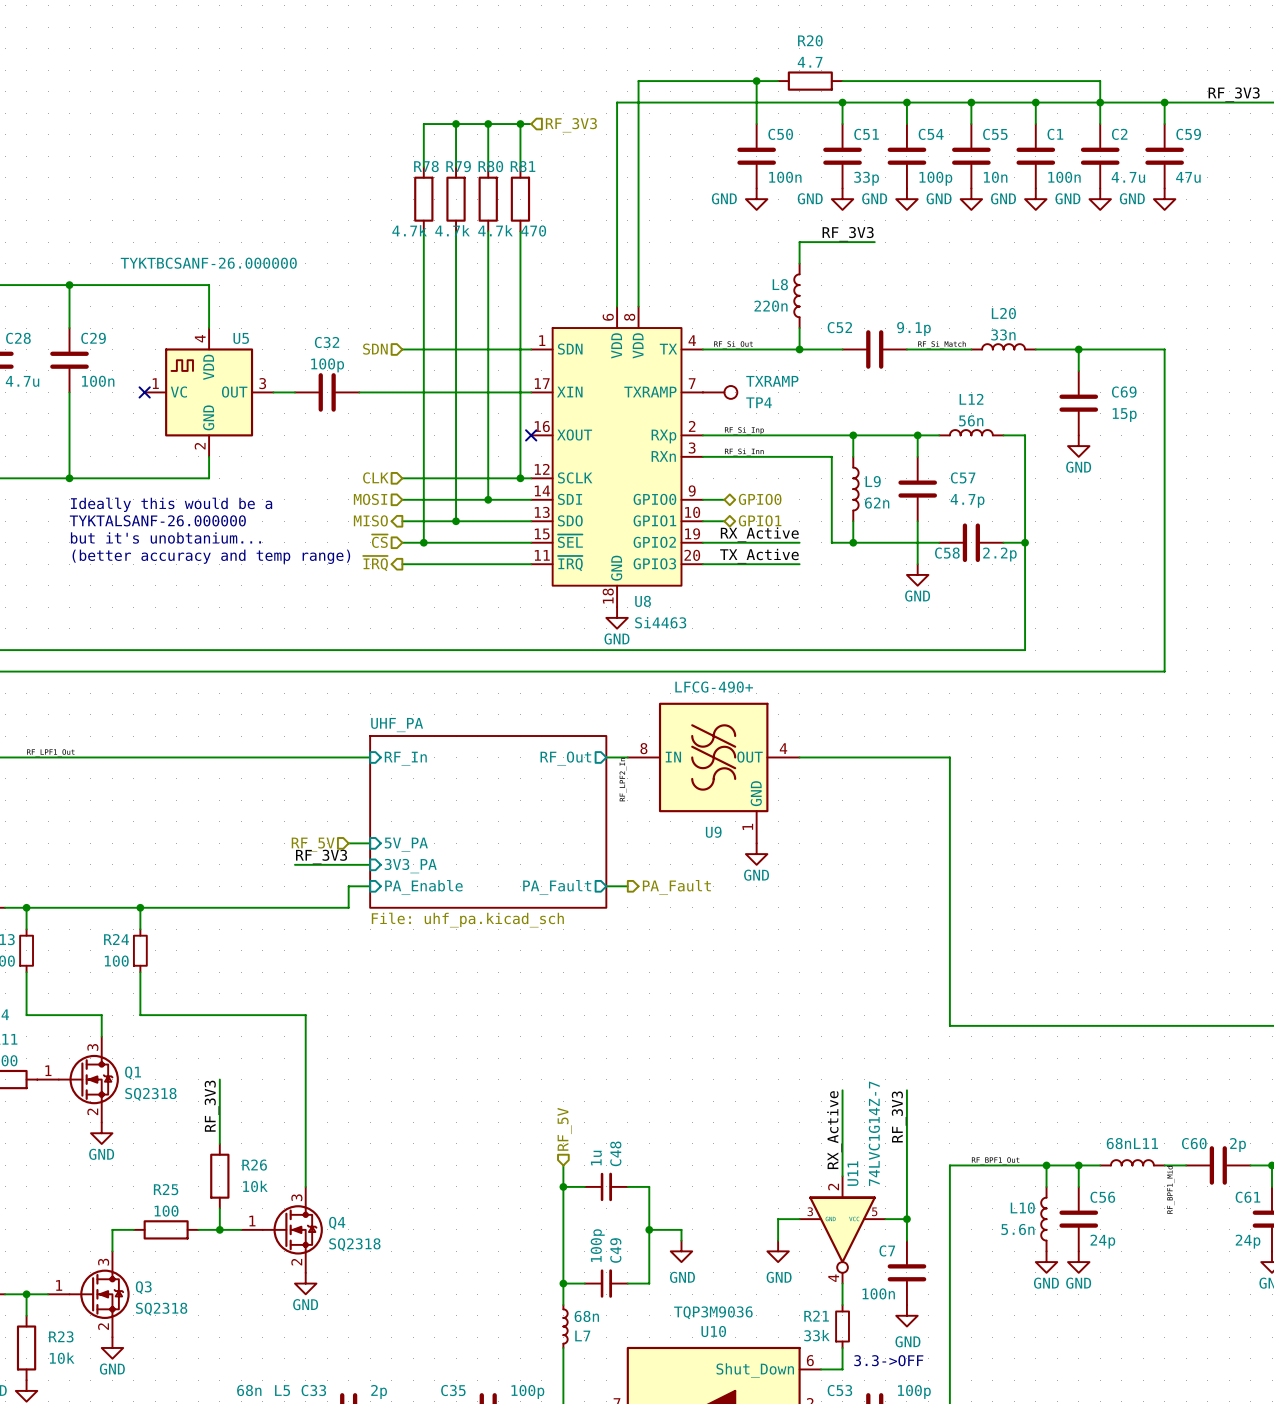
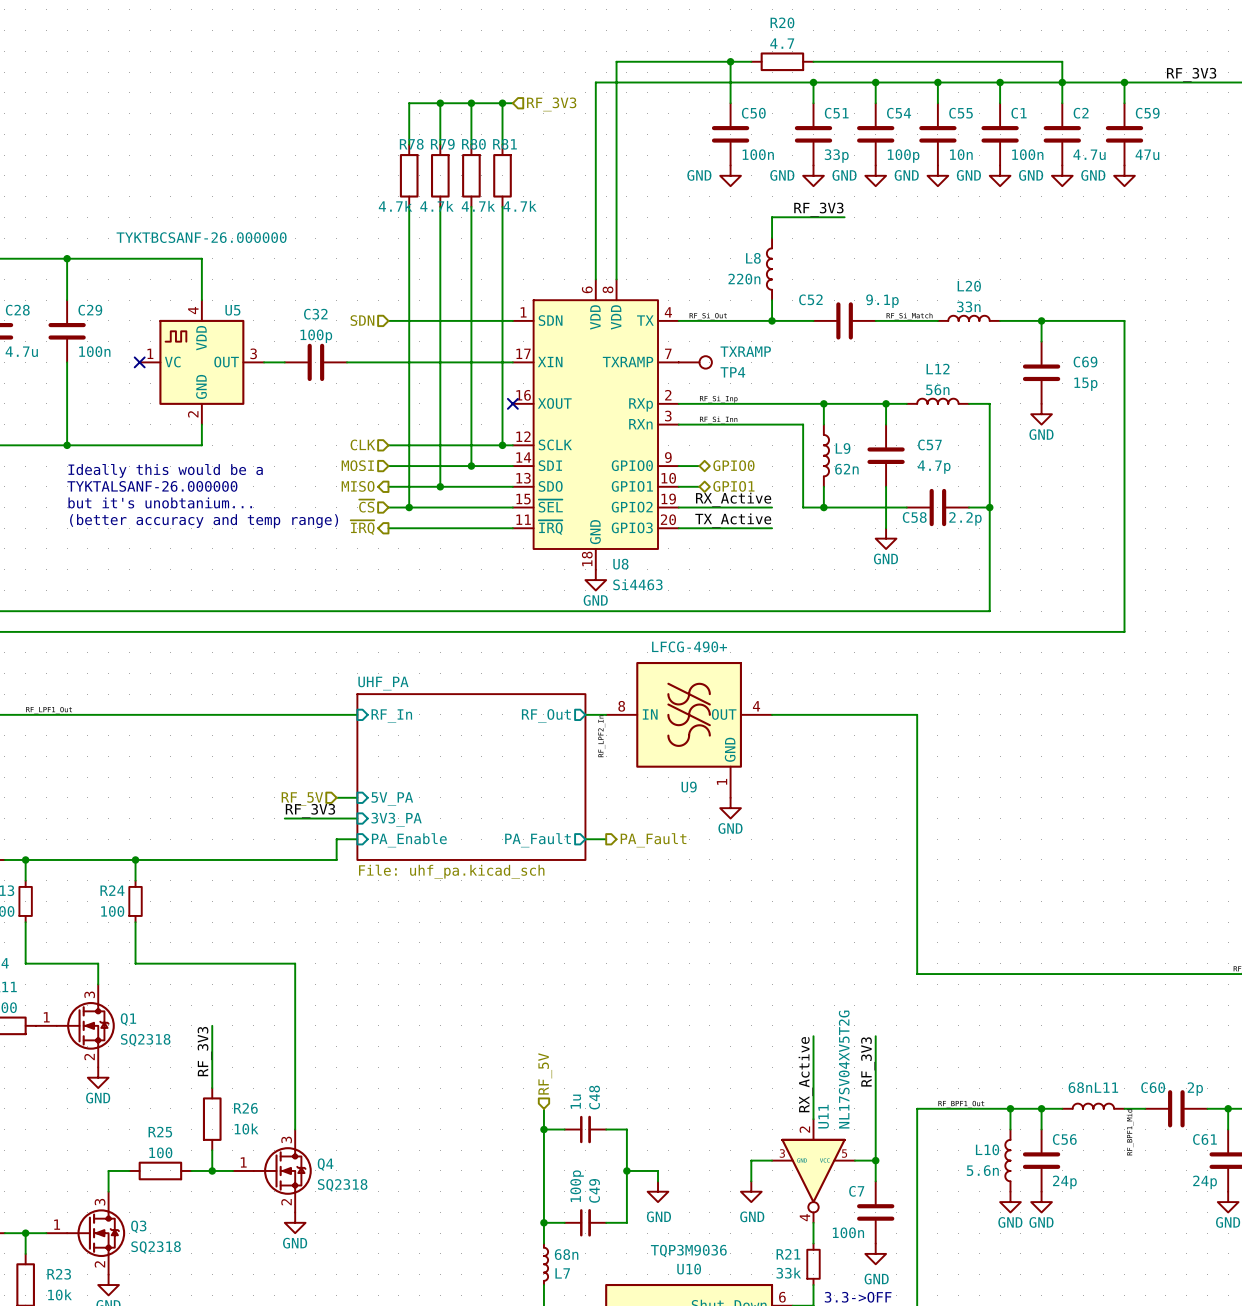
R81 value: 470 (533, 230) -> 4.7k (519, 206)
U11 value: 74LVC1G14Z-7 (874, 1133) -> NL17SV04XV5T2G (844, 1069)

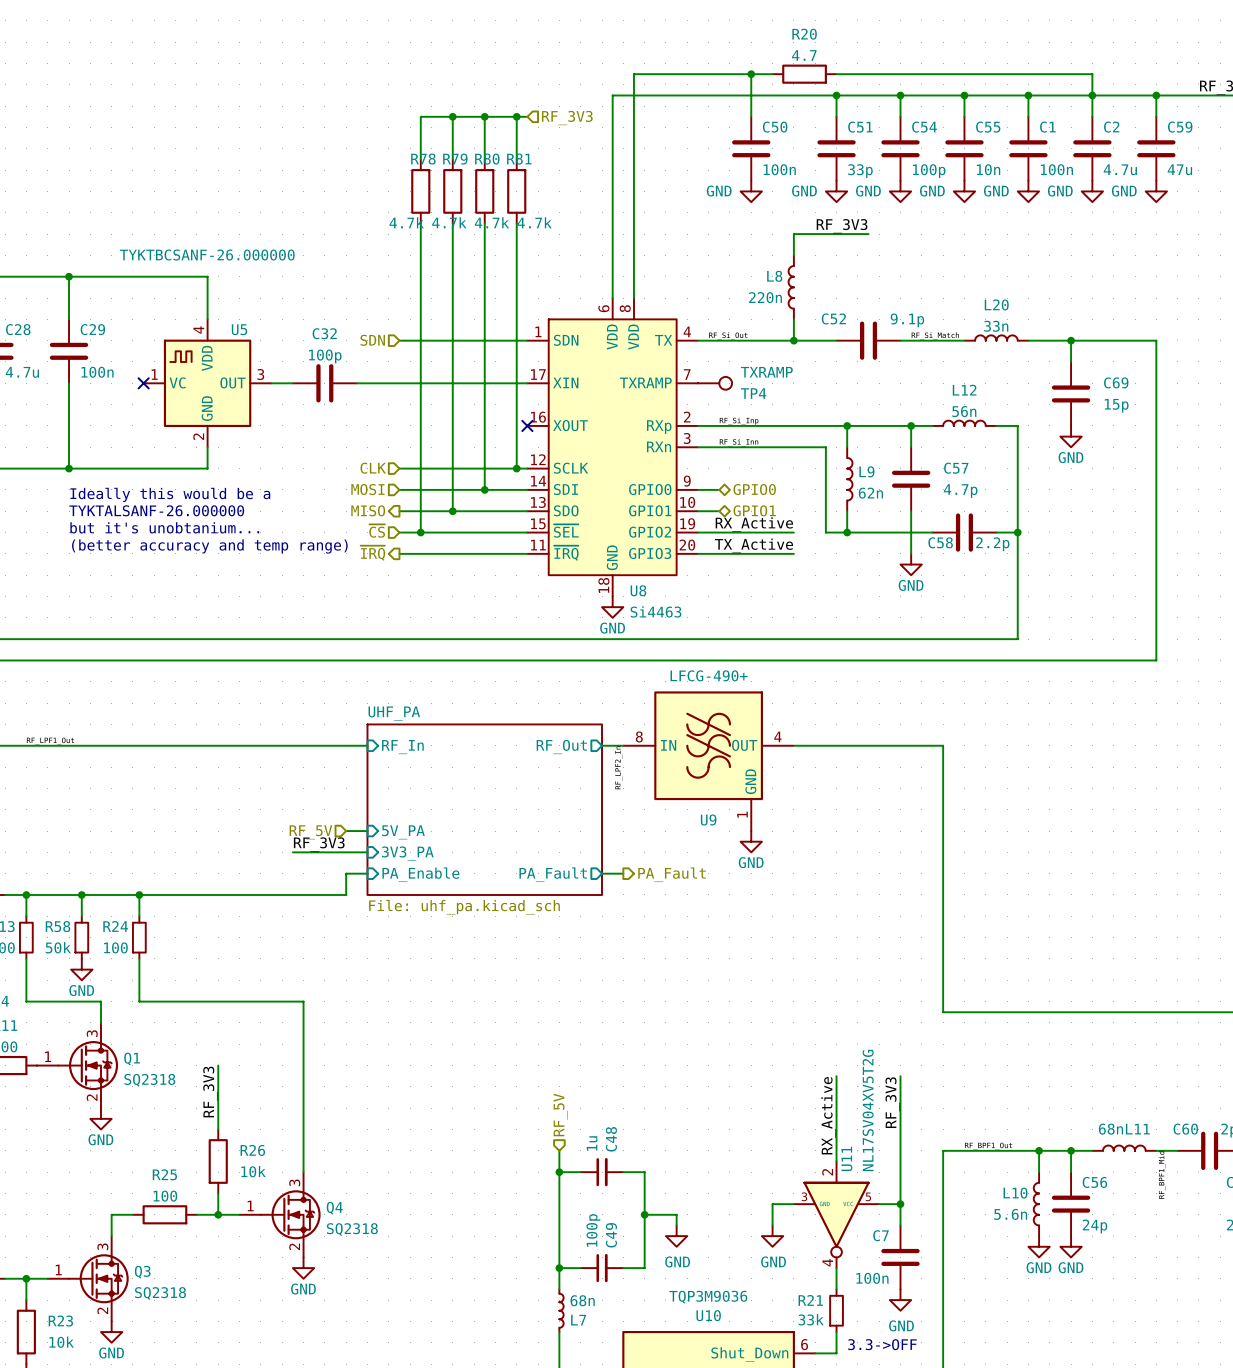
wire: none -> (81, 894) (81, 916)
junction: none -> (81, 894)
R58: none -> 50k (81, 937)
power symbol: none -> GND (81, 969)

